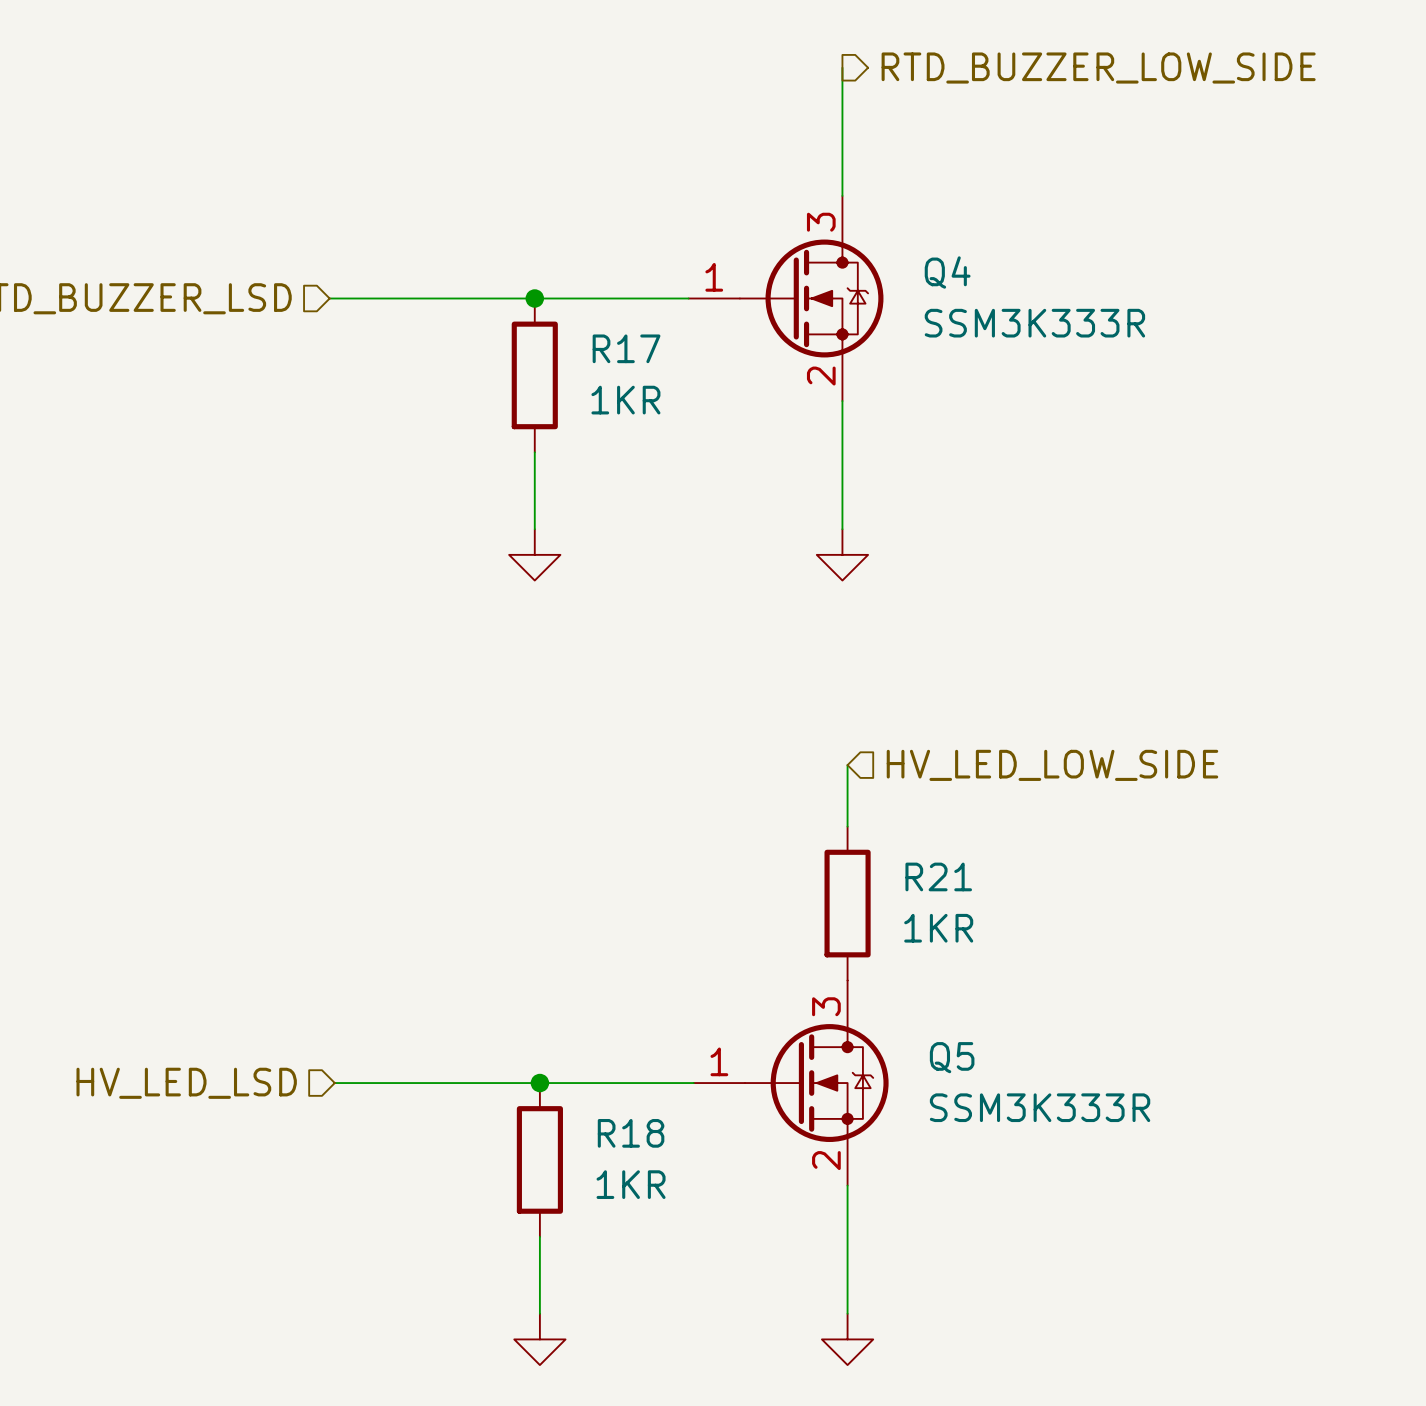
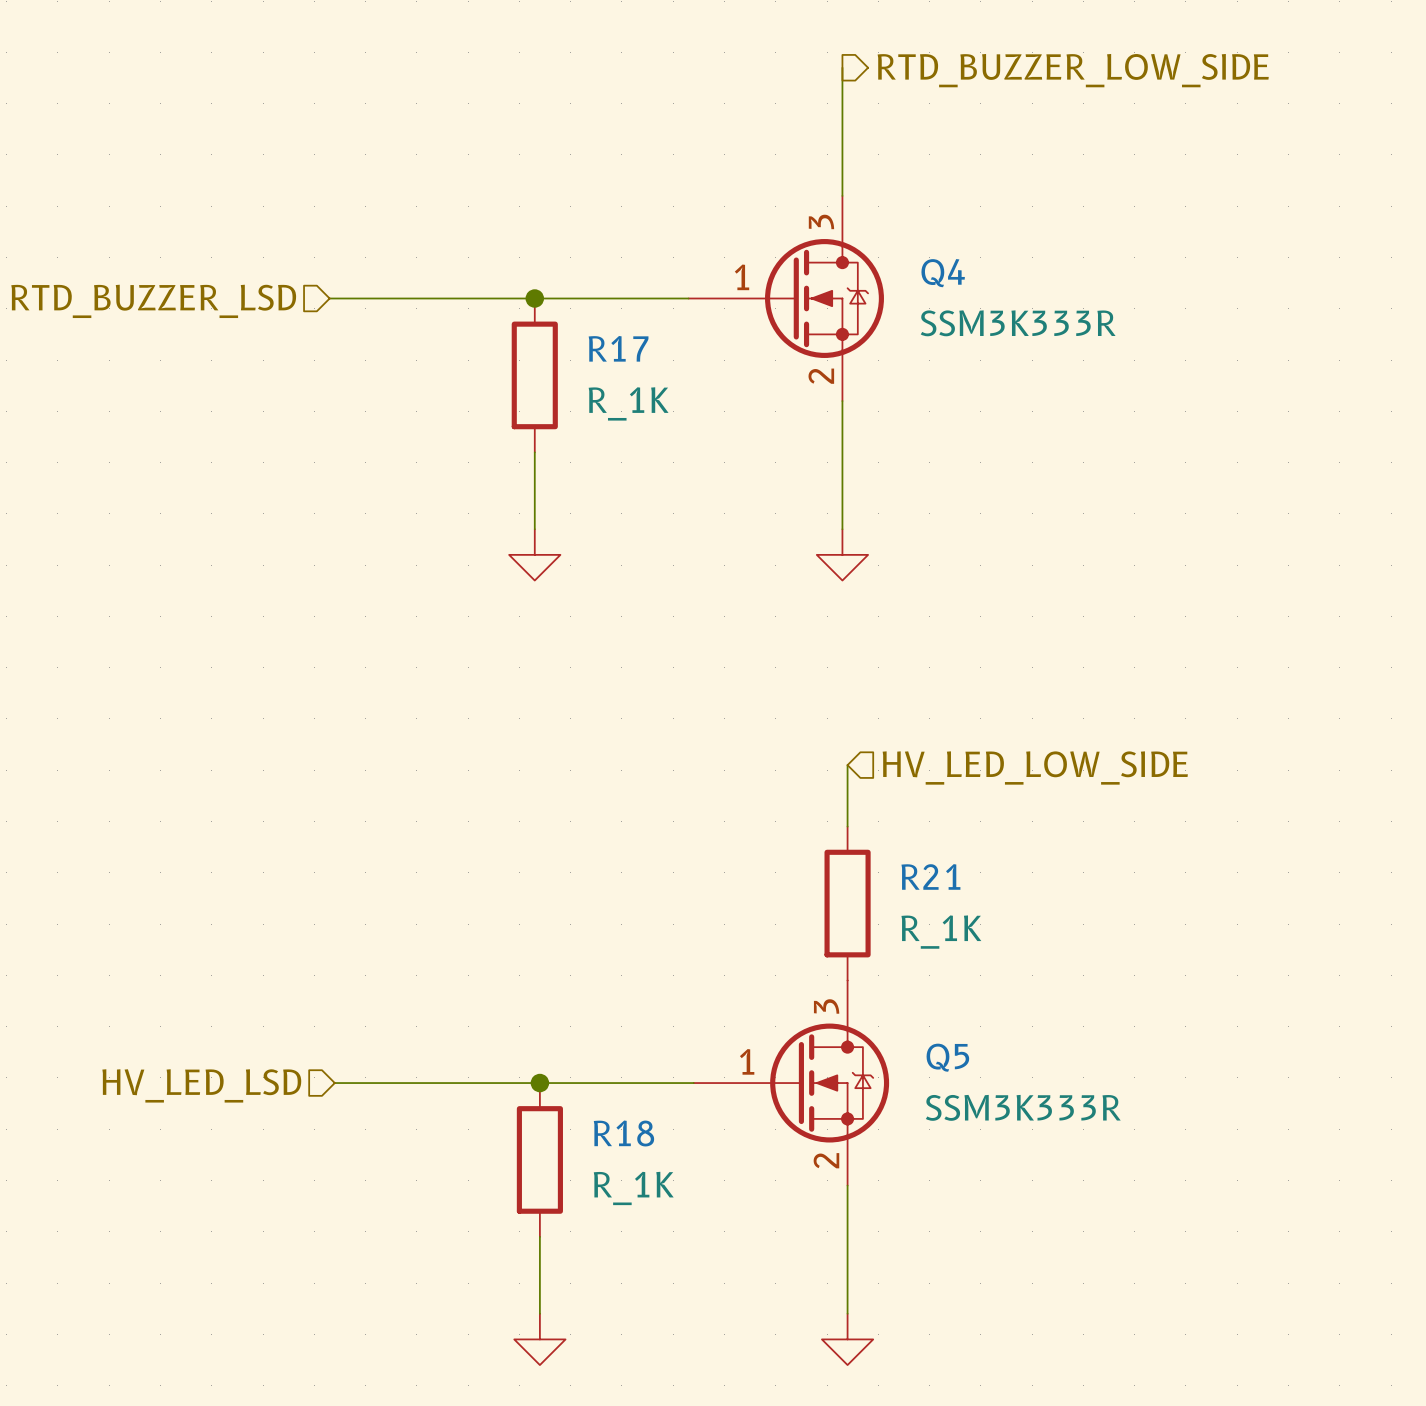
Q4 symbol: [688, 195, 884, 402] -> [688, 195, 884, 402]
R17 value: 1KR (625, 400) -> R_1K (628, 403)
R21 value: 1KR (938, 928) -> R_1K (941, 932)
Q5 symbol: [693, 980, 889, 1186] -> [693, 980, 890, 1186]
R18 value: 1KR (631, 1184) -> R_1K (633, 1188)

